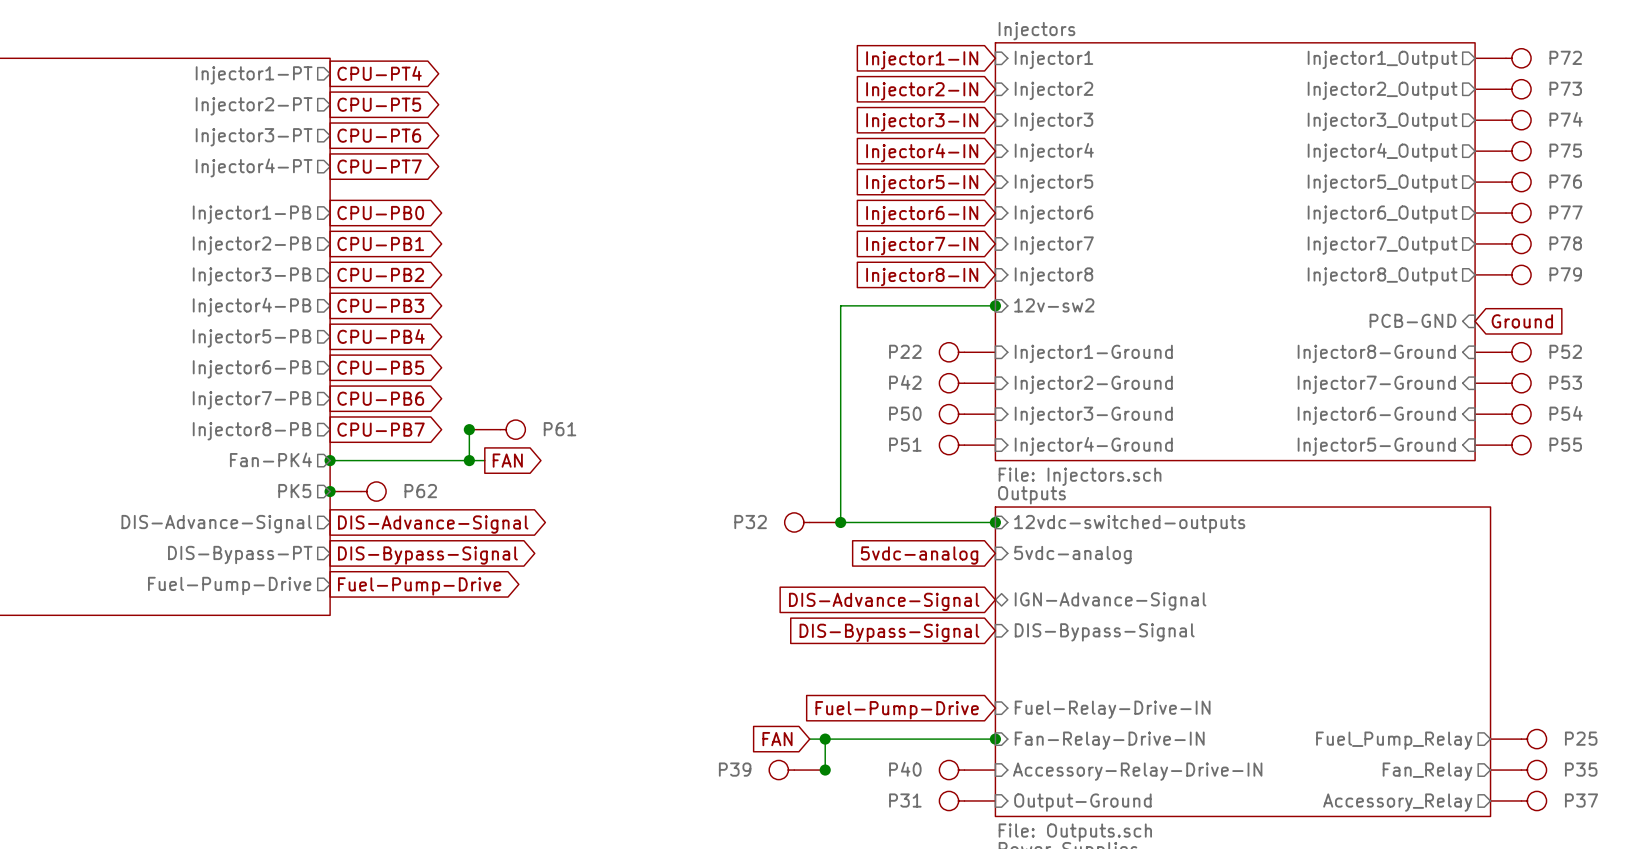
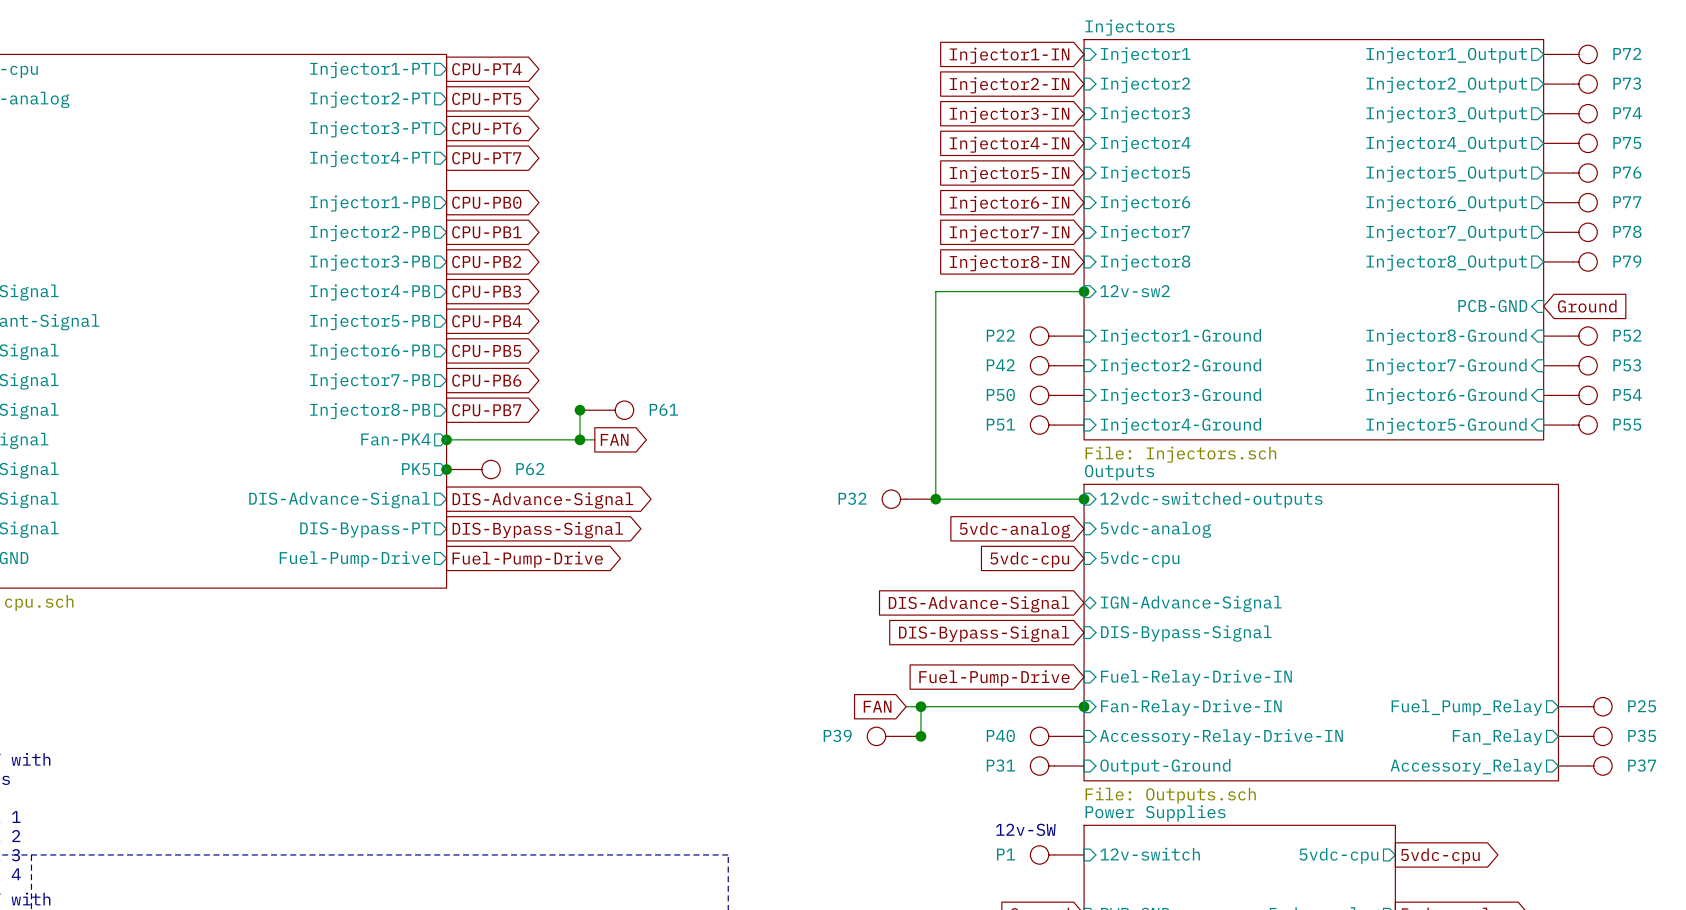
sheet pin: none -> 5vdc-cpu (1140, 559)
global label: none -> 5vdc-cpu (1029, 559)
global label: DIS-Advance-Signal (884, 601) -> none
sheet pin: IGN-Advance-Signal (1110, 601) -> none
global label: DIS-Bypass-Signal (889, 632) -> DIS-Advance-Signal (979, 604)
sheet pin shape: input (1104, 632) -> bidirectional (1191, 603)
sheet pin: DIS-Bypass-Signal (1104, 632) -> IGN-Advance-Signal (1191, 603)
global label: none -> DIS-Bypass-Signal (984, 633)
sheet pin: none -> DIS-Bypass-Signal (1186, 633)

